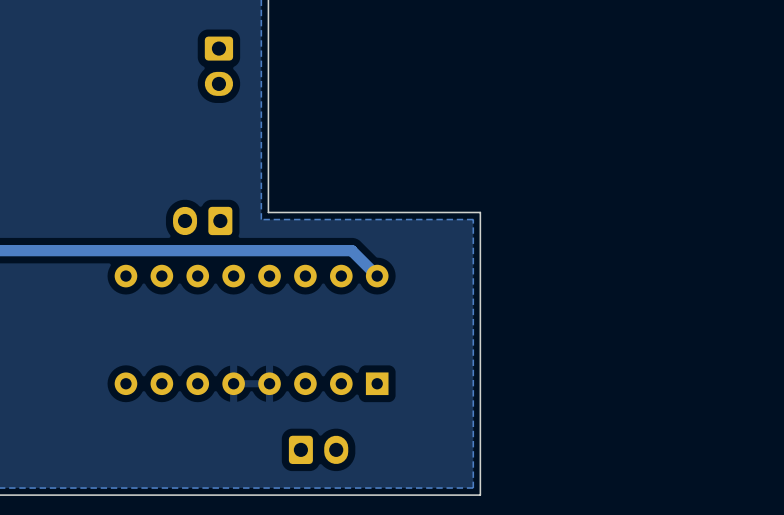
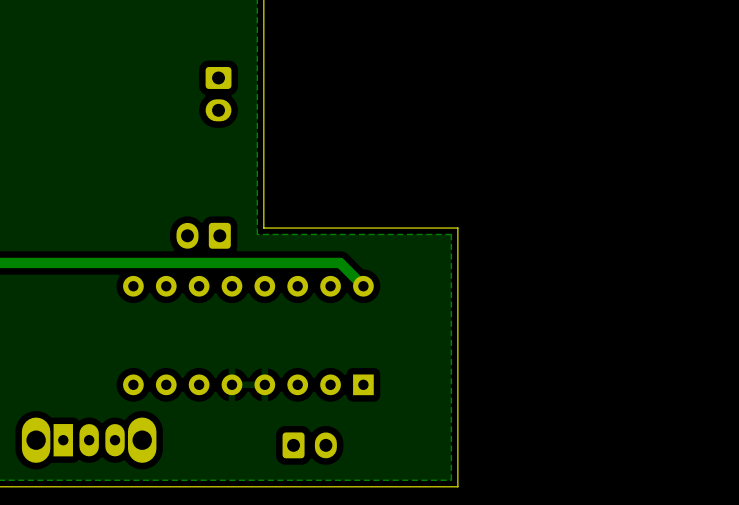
part: none -> (89, 440)

